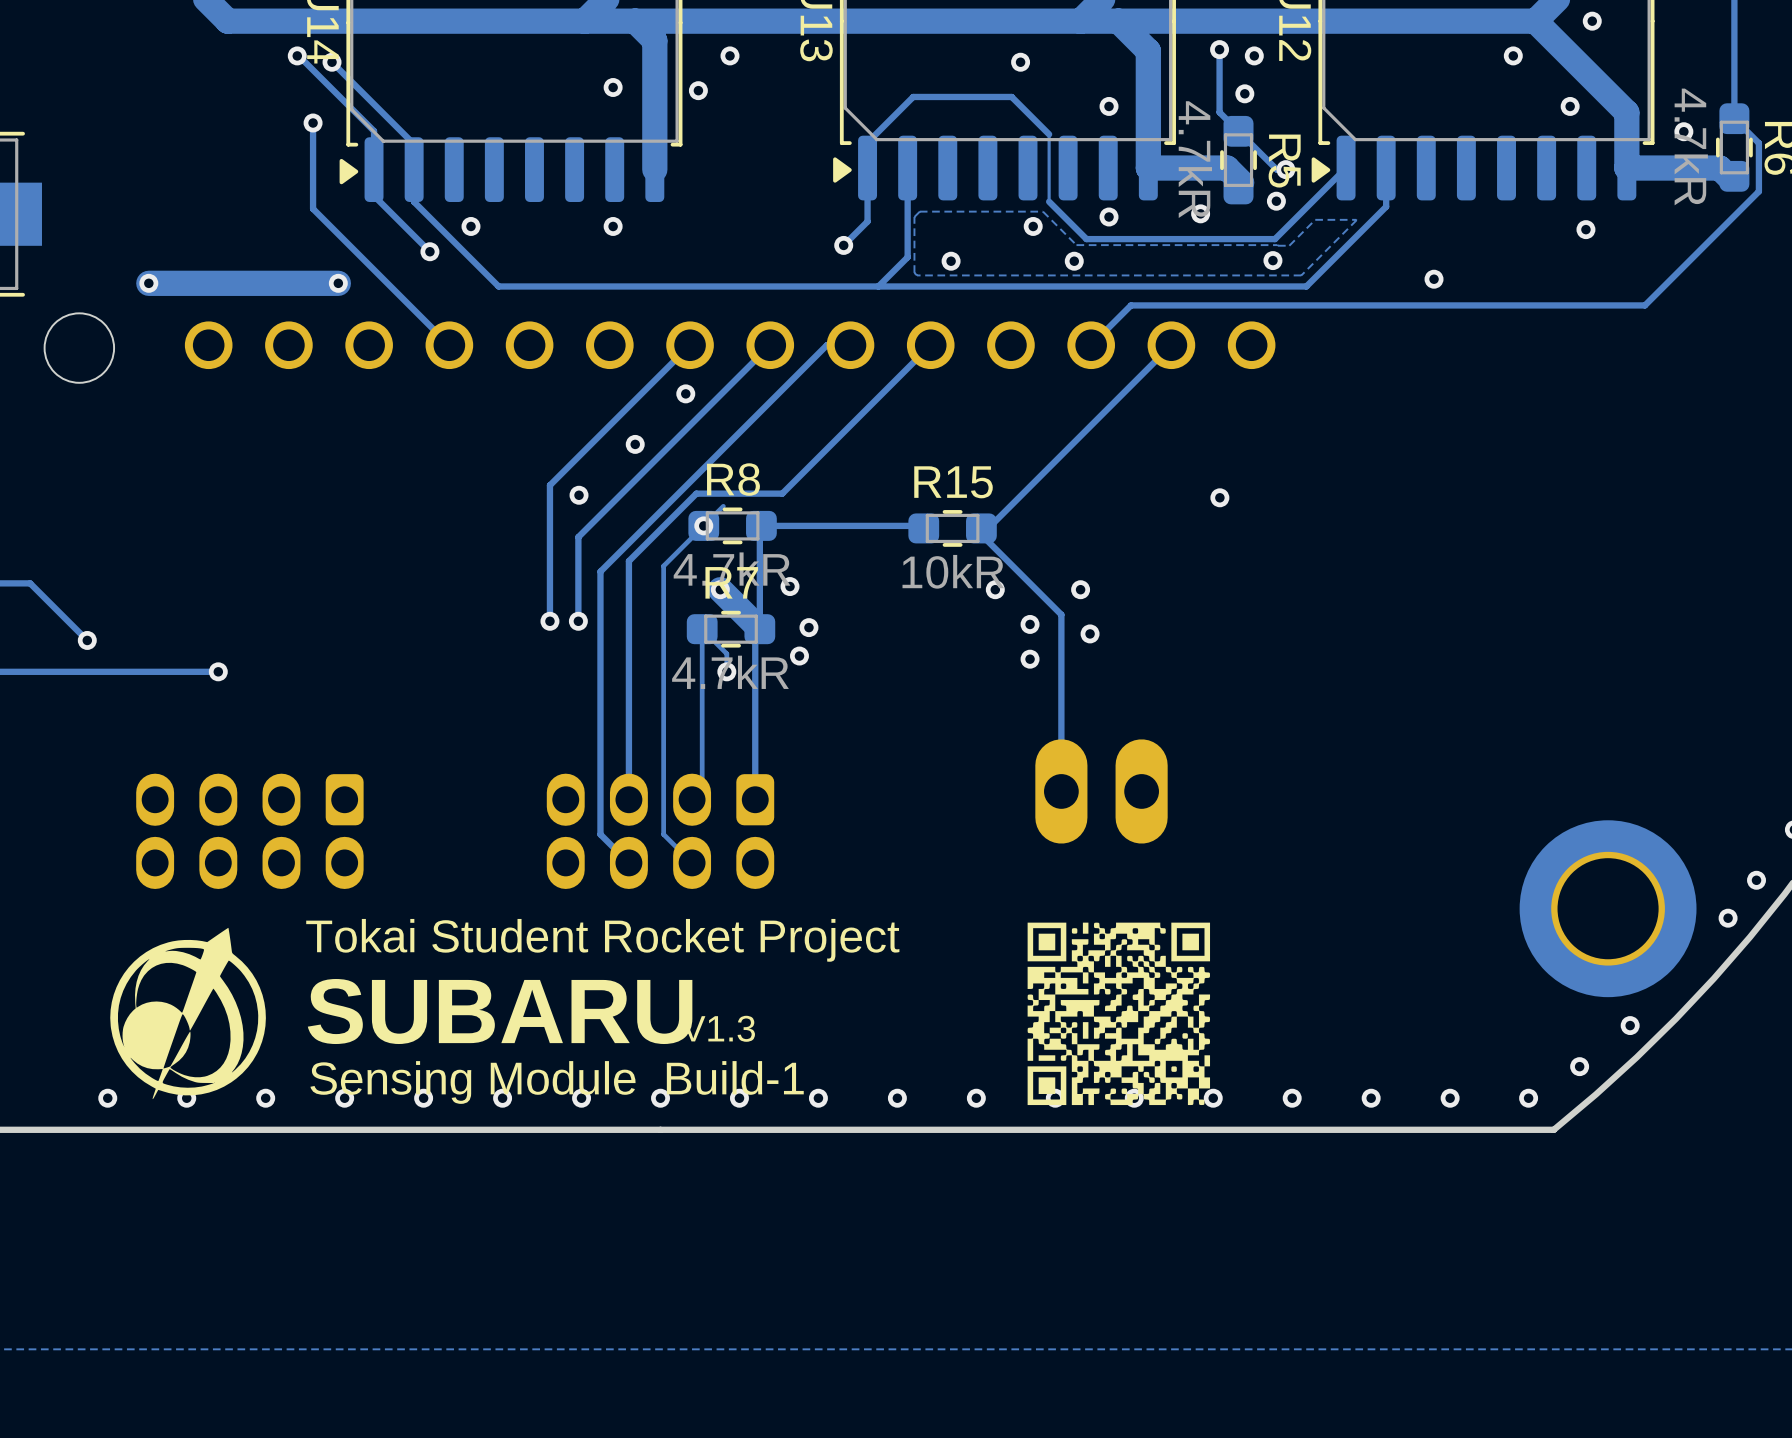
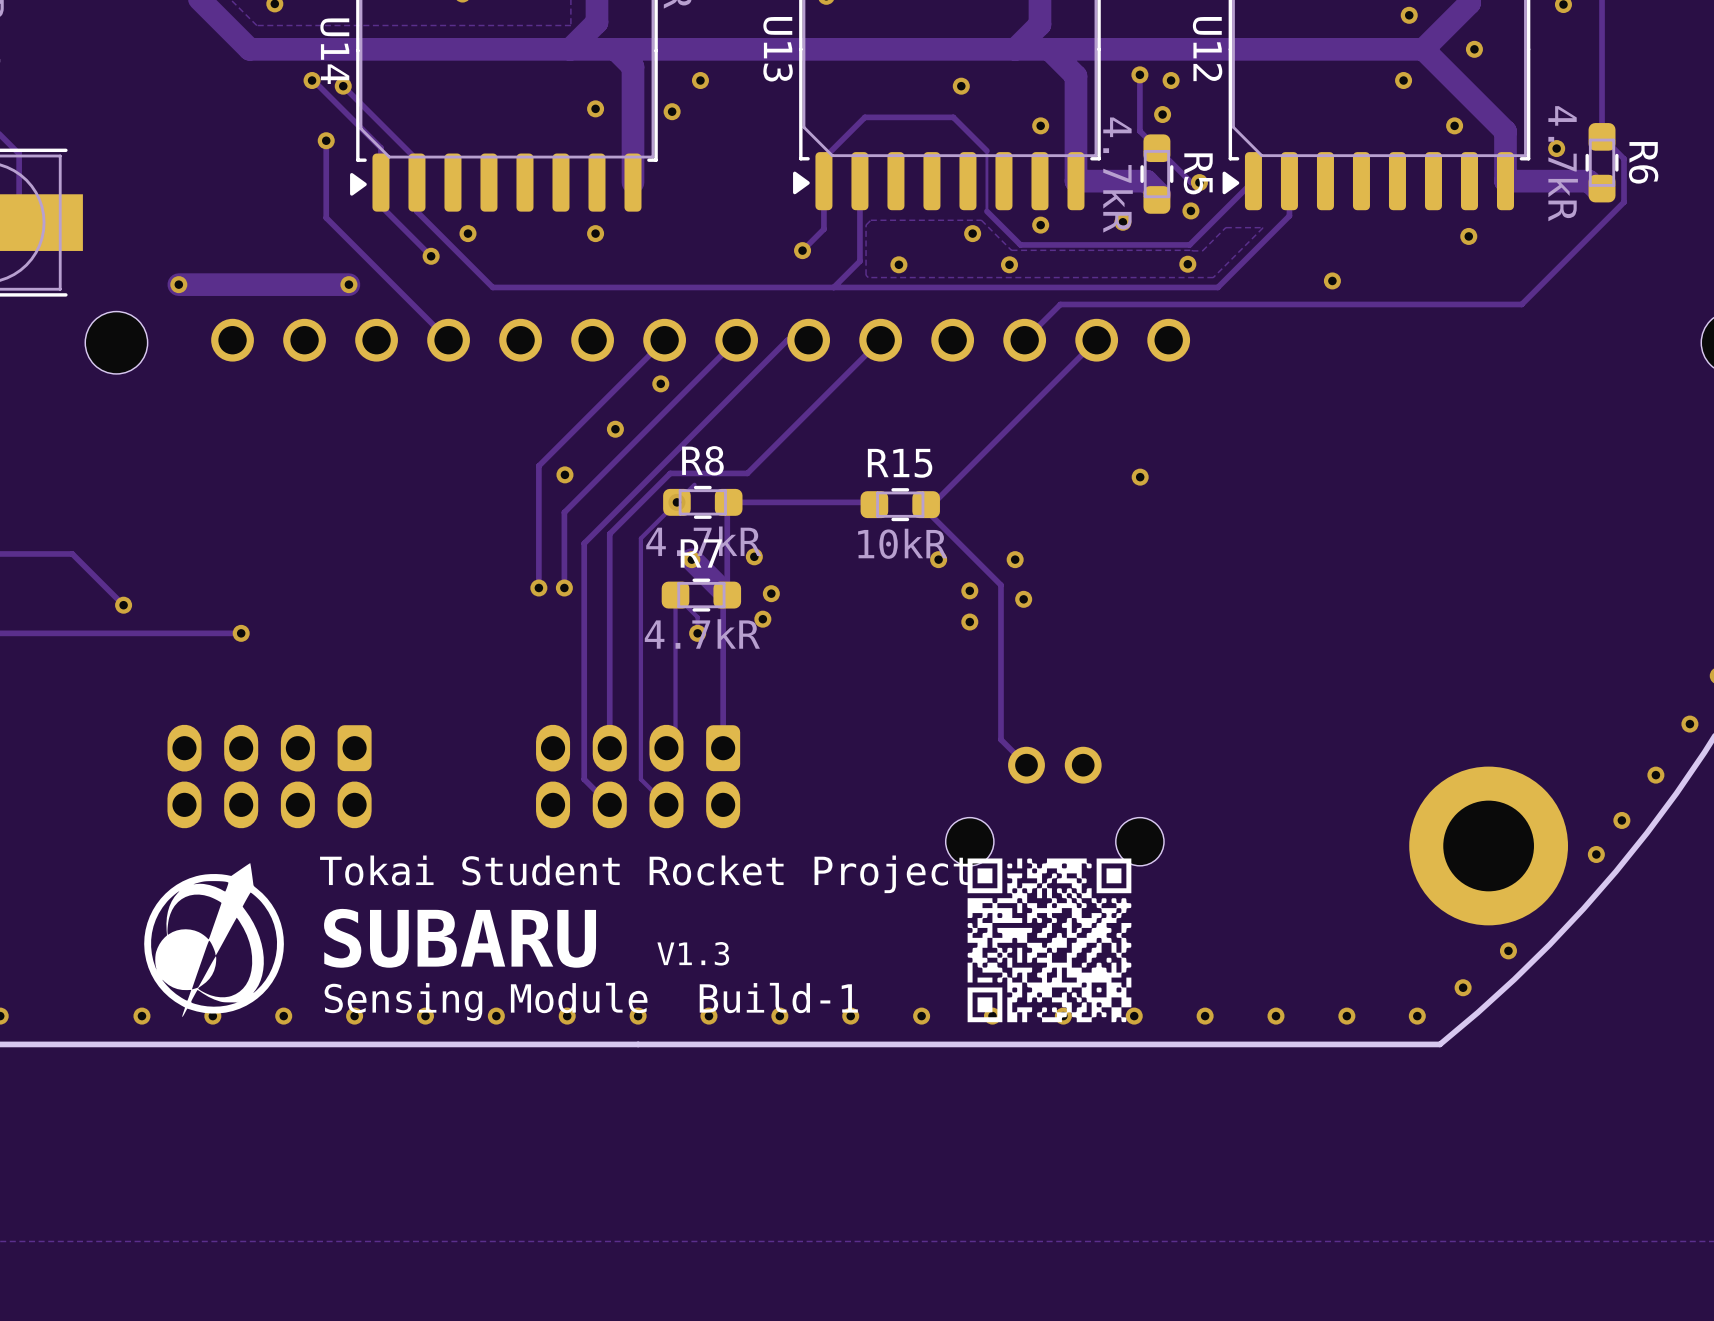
track: (1061, 614) (1061, 791) -> (997, 582) (1000, 585) (1000, 739) (1026, 765)
part: (1101, 791) -> none
part: none -> (1054, 806)

